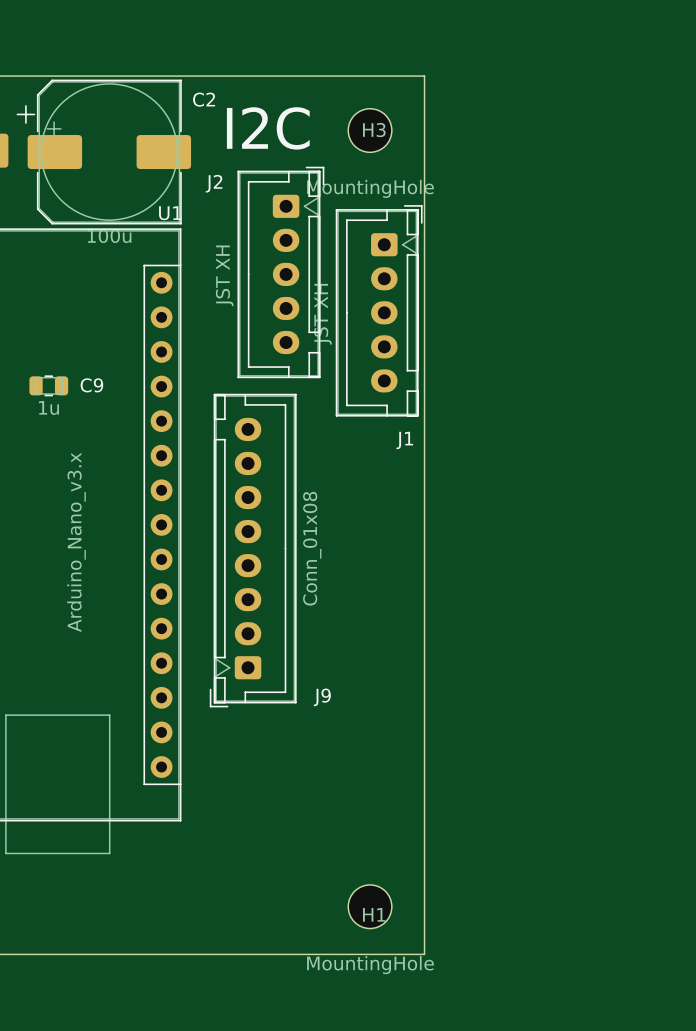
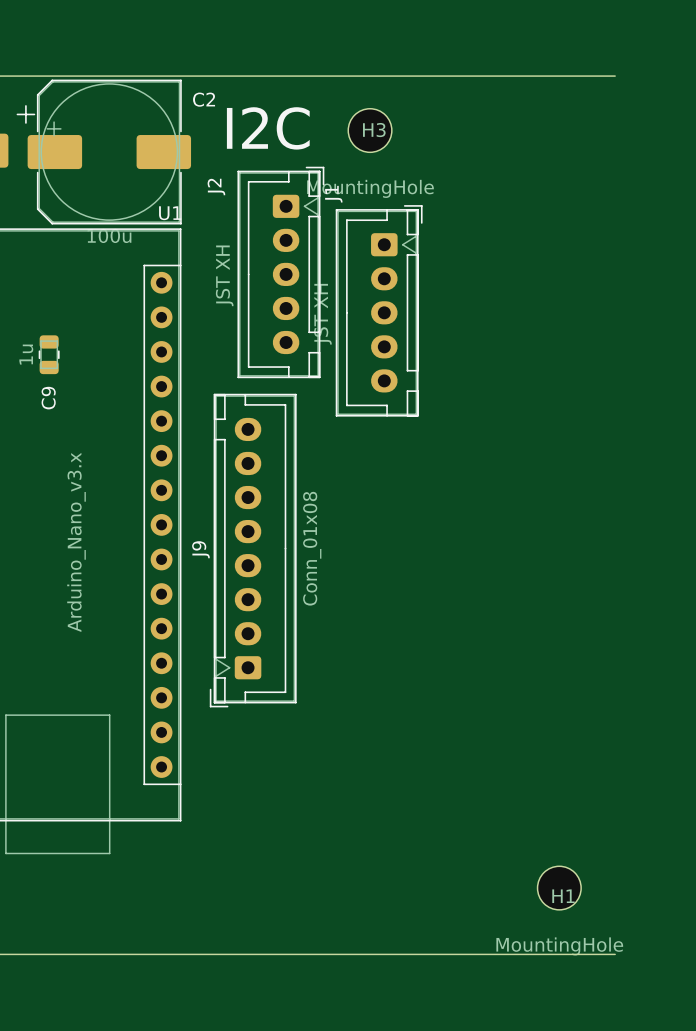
board edge: (424, 76) (424, 954) -> (424, 76) (615, 76)
J2 name rotation: 0° (214, 183) -> 90° counterclockwise (216, 187)
C9 rotation: 0° (48, 385) -> 90° clockwise (49, 354)
C9 position: (48, 385) -> (49, 354)
J1 name rotation: 0° (404, 440) -> 90° counterclockwise (333, 194)
J1 name position: J1 (404, 440) -> J1 (333, 194)
J9 name rotation: 0° (322, 697) -> 90° counterclockwise (200, 549)
J9 name position: J9 (322, 697) -> J9 (200, 549)
H1 position: (370, 906) -> (559, 888)
board edge: none -> (424, 954) (615, 954)

